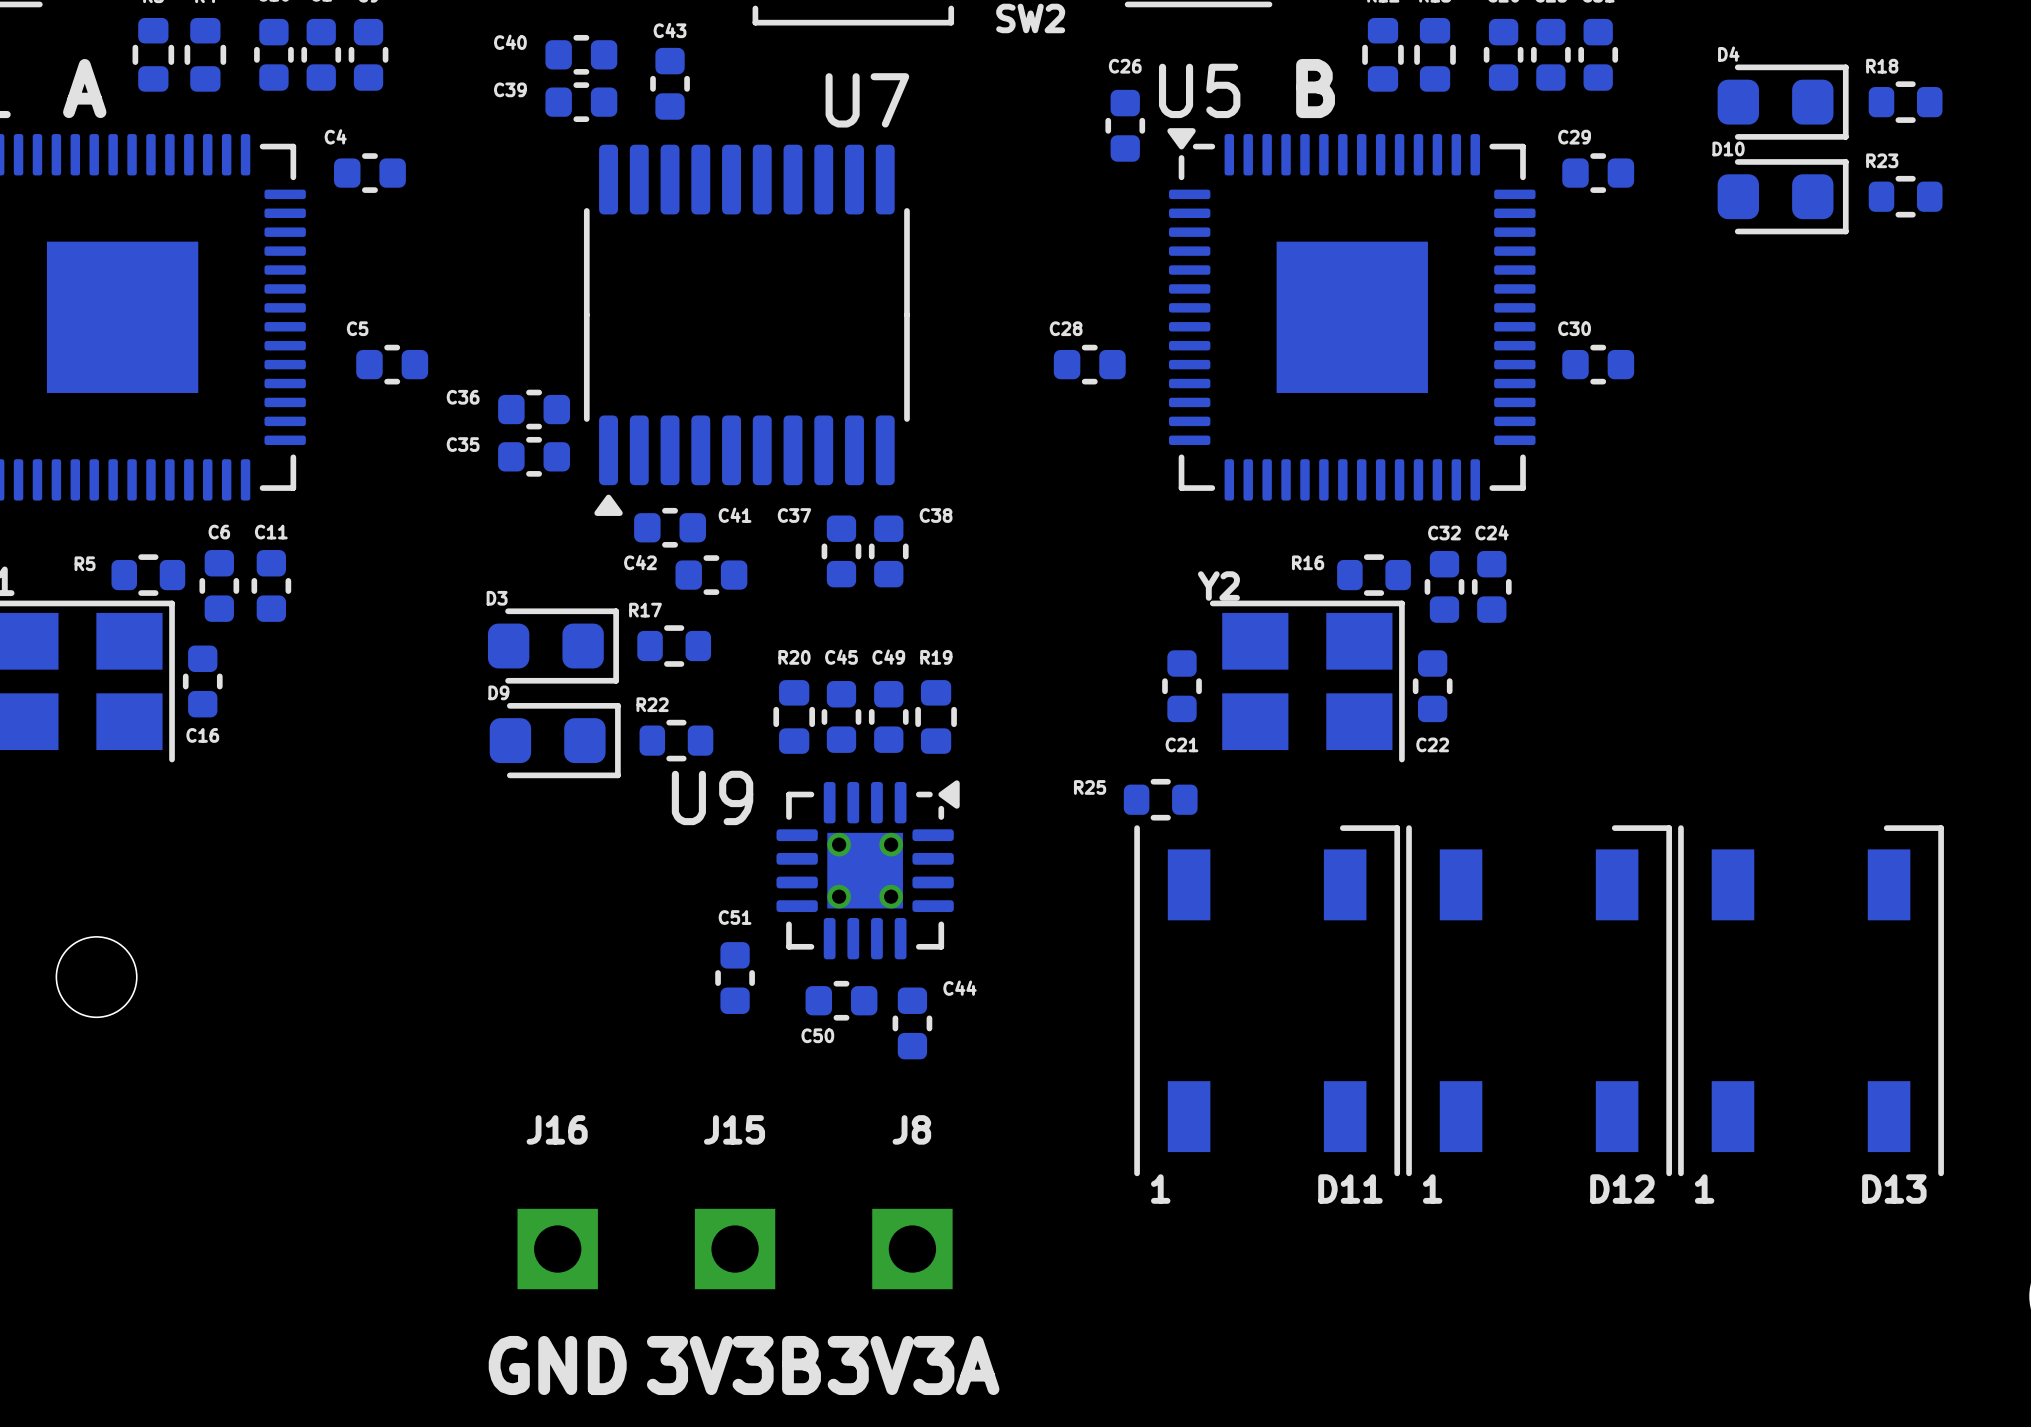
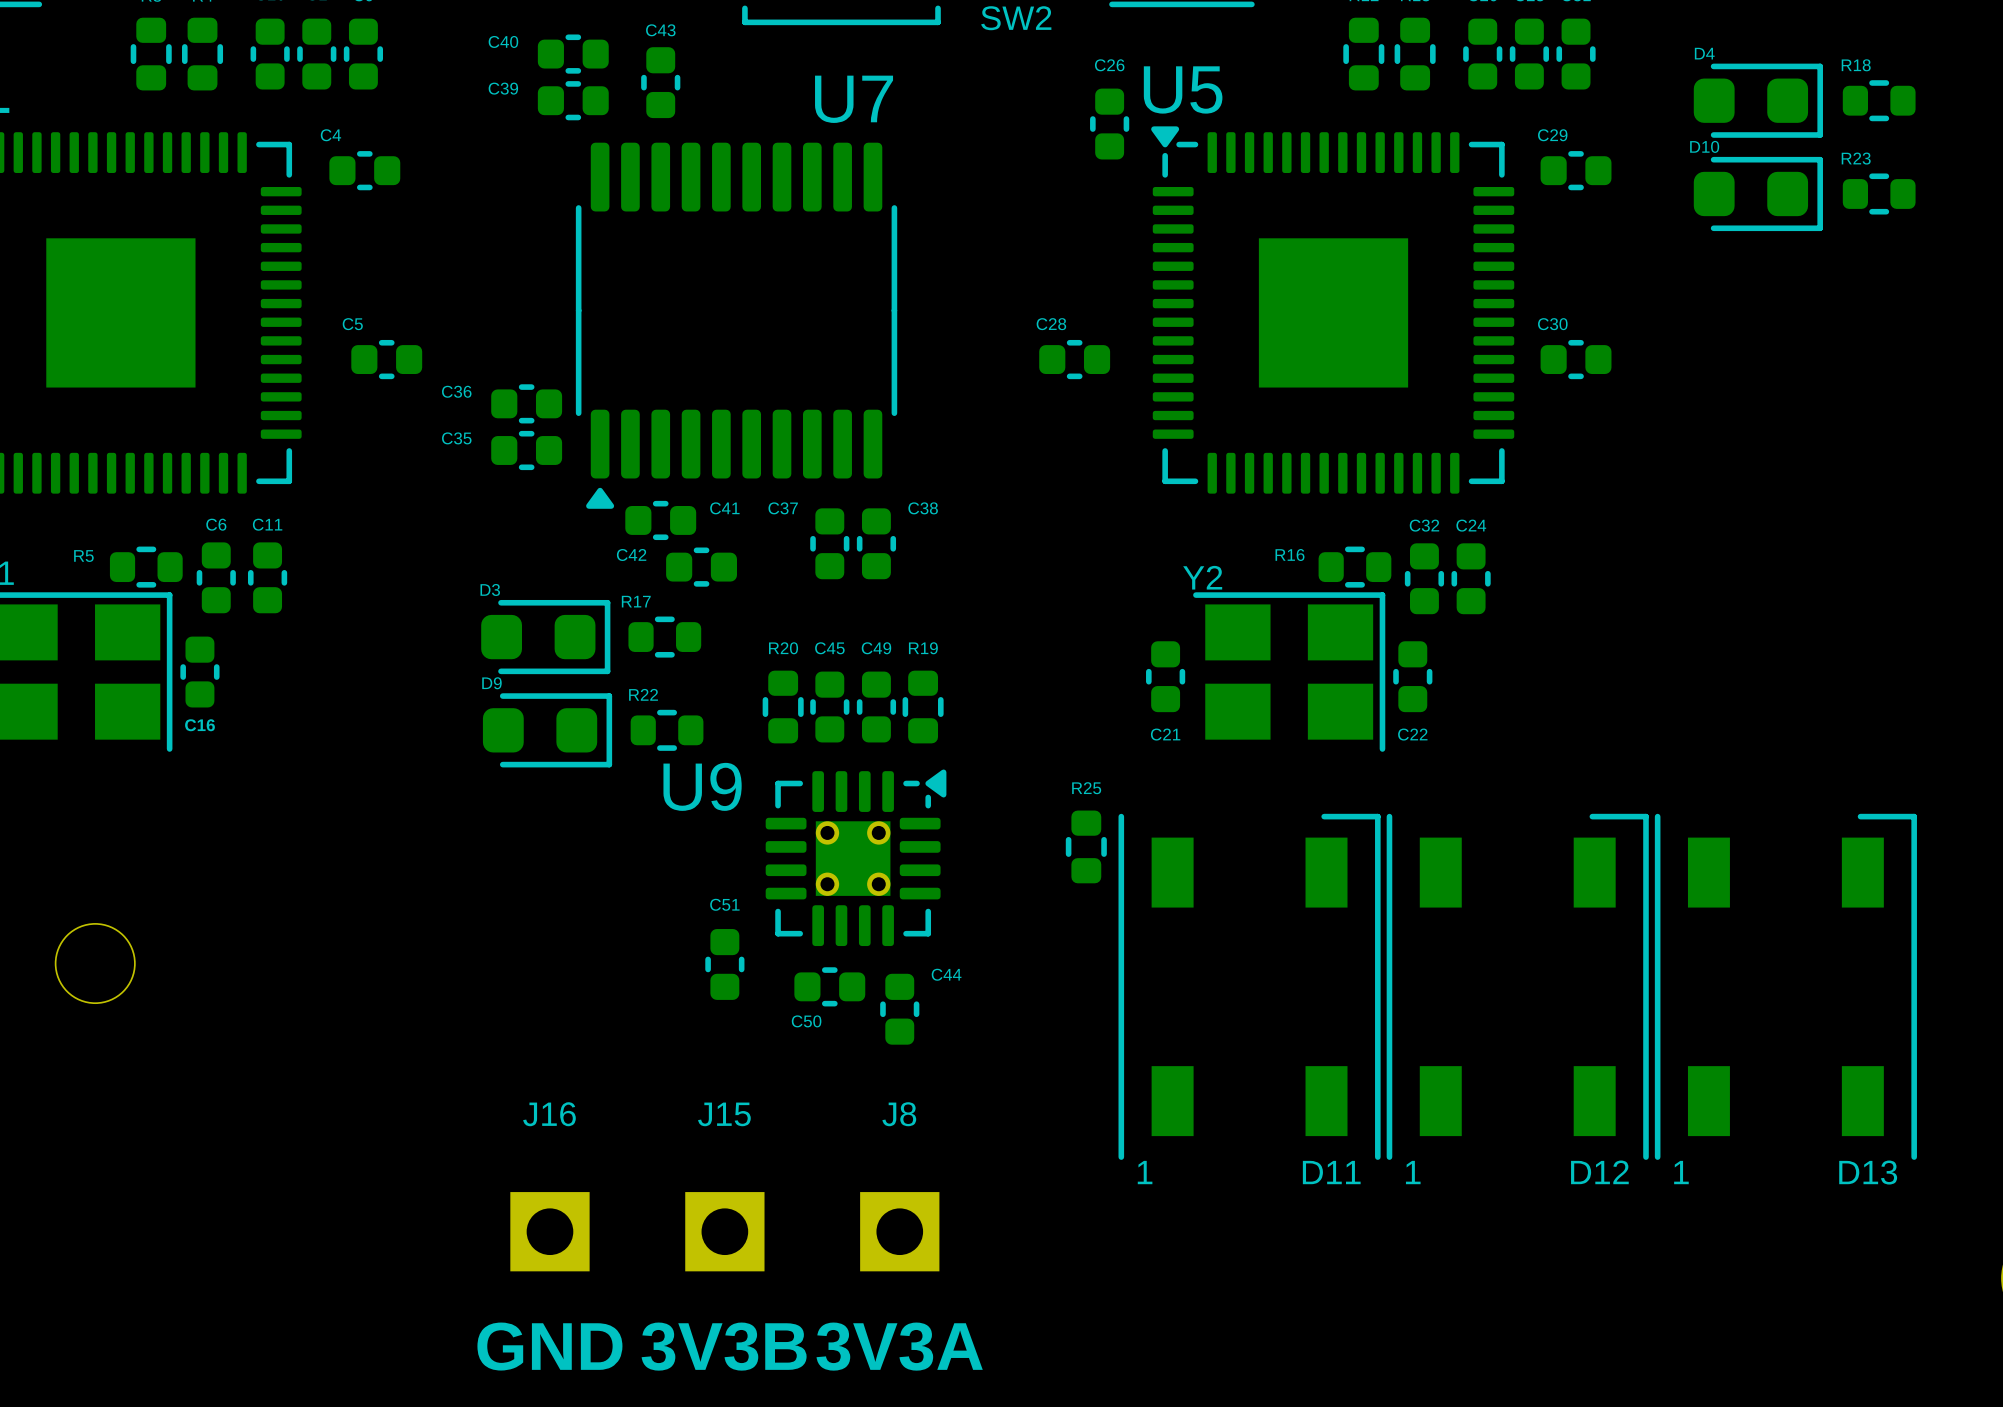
text: A (84, 88) -> none
text: B (1315, 88) -> none
R25 rotation: 0° (1160, 799) -> 90° clockwise (1086, 846)
R25 position: (1160, 799) -> (1086, 846)

